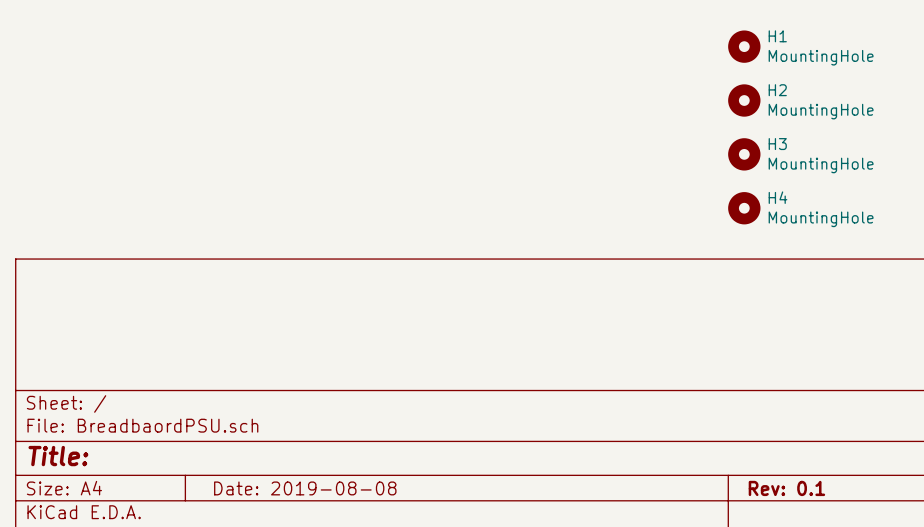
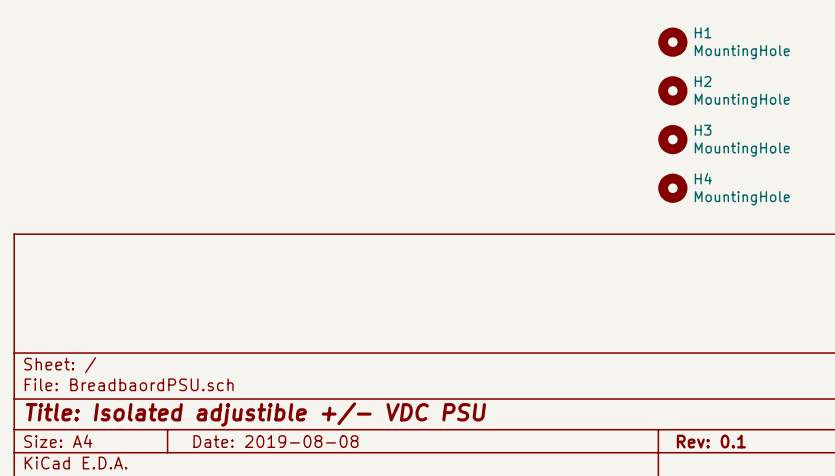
title block: Title: (58, 456) -> Title: Isolated adjustible +/- VDC PSU (255, 414)

